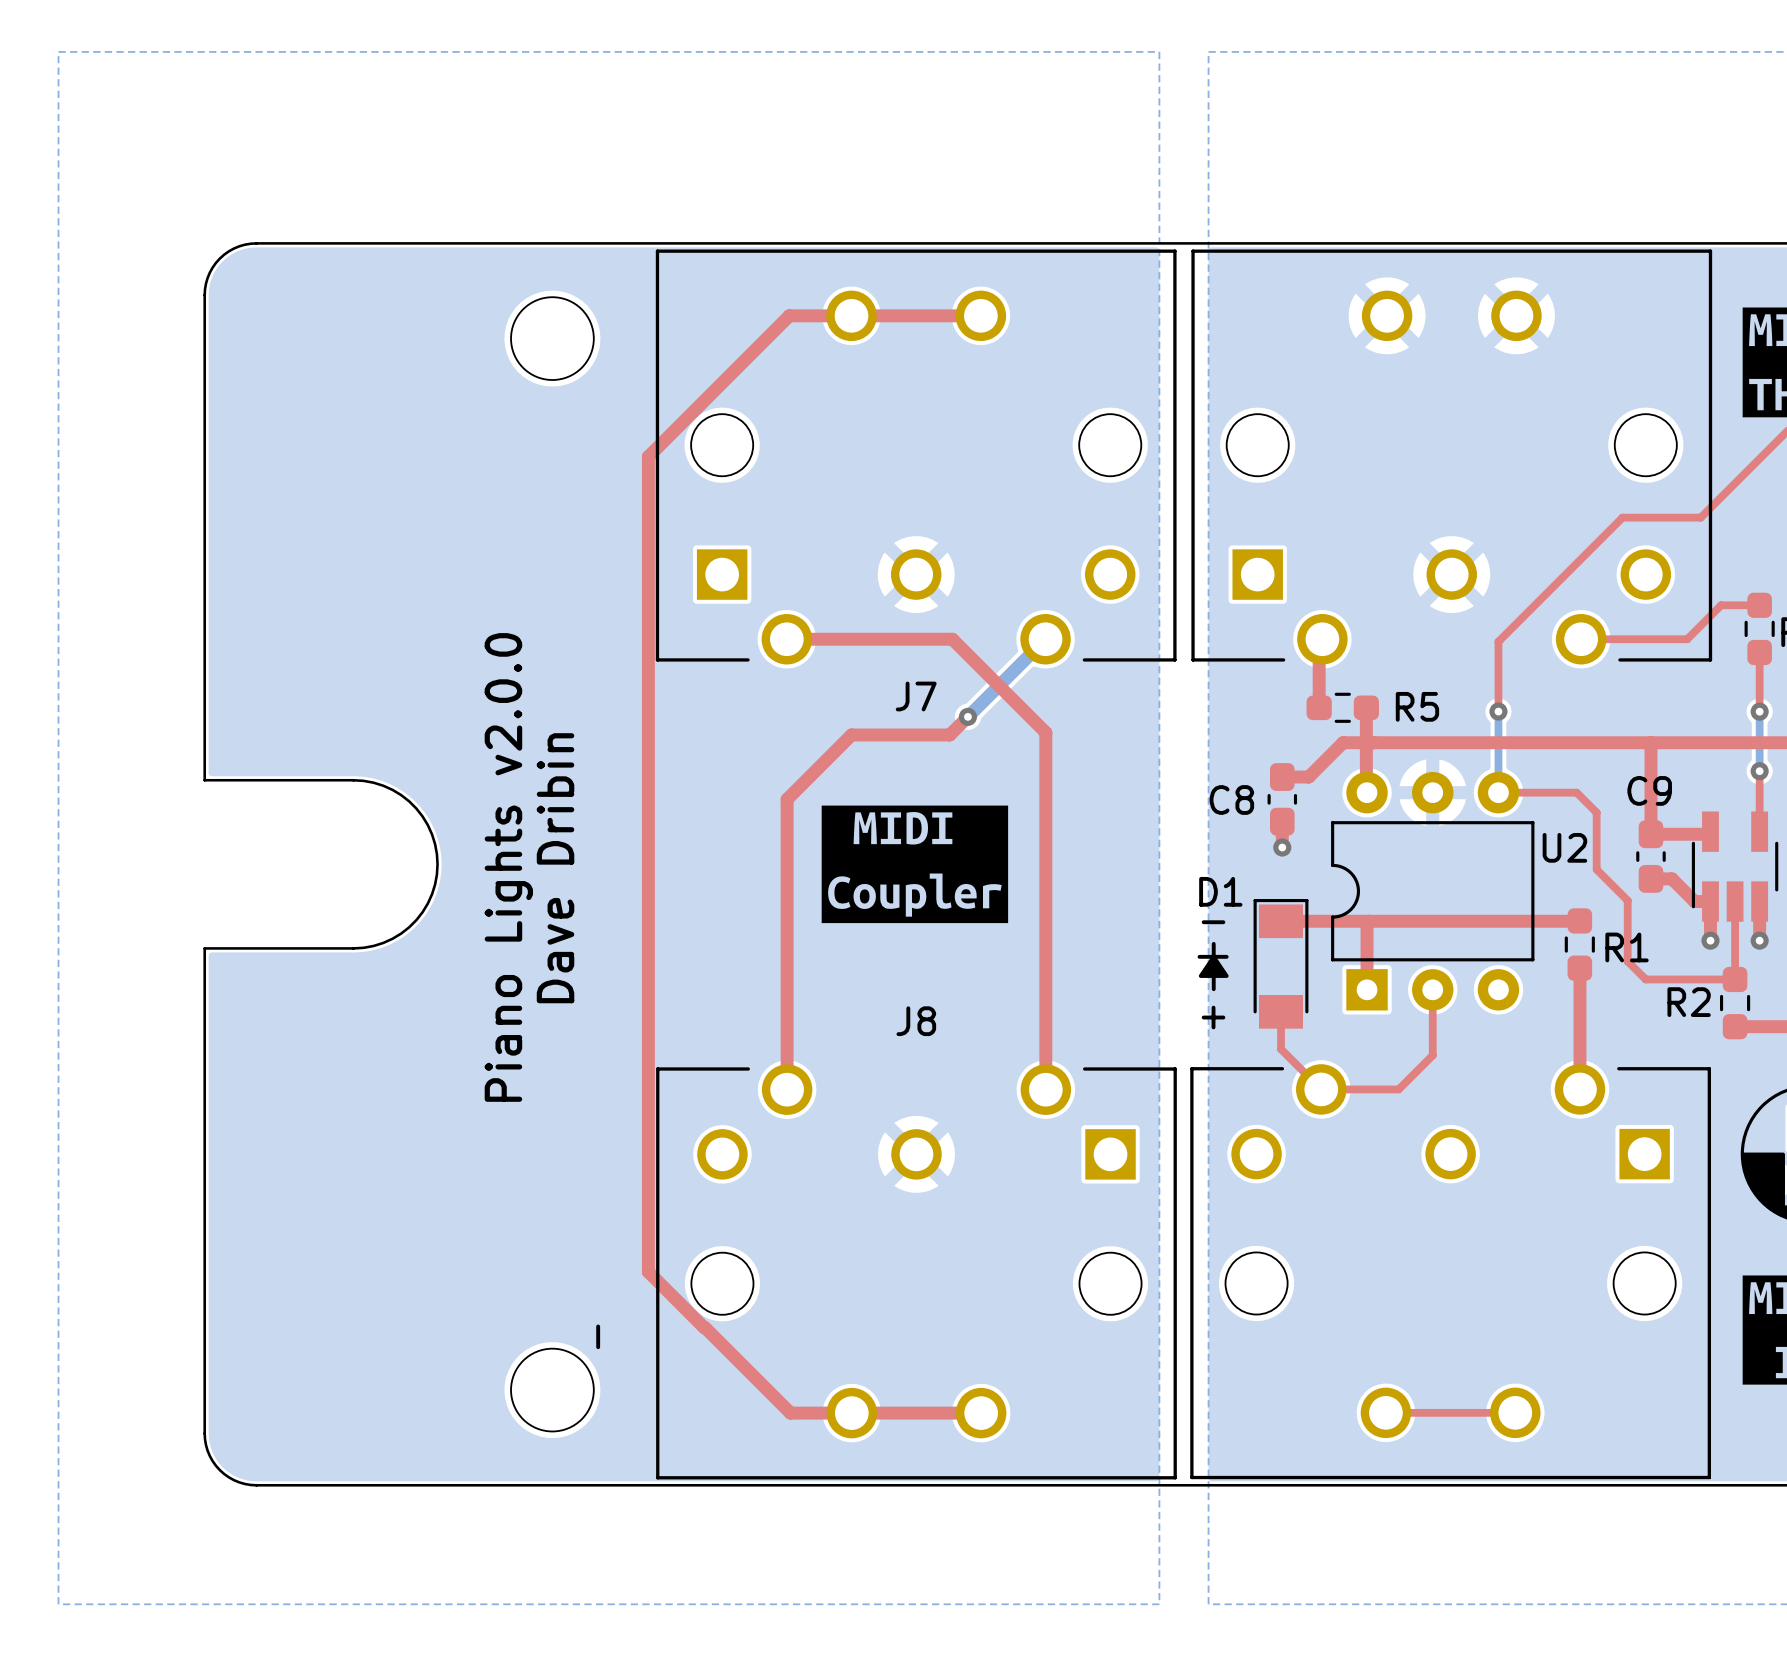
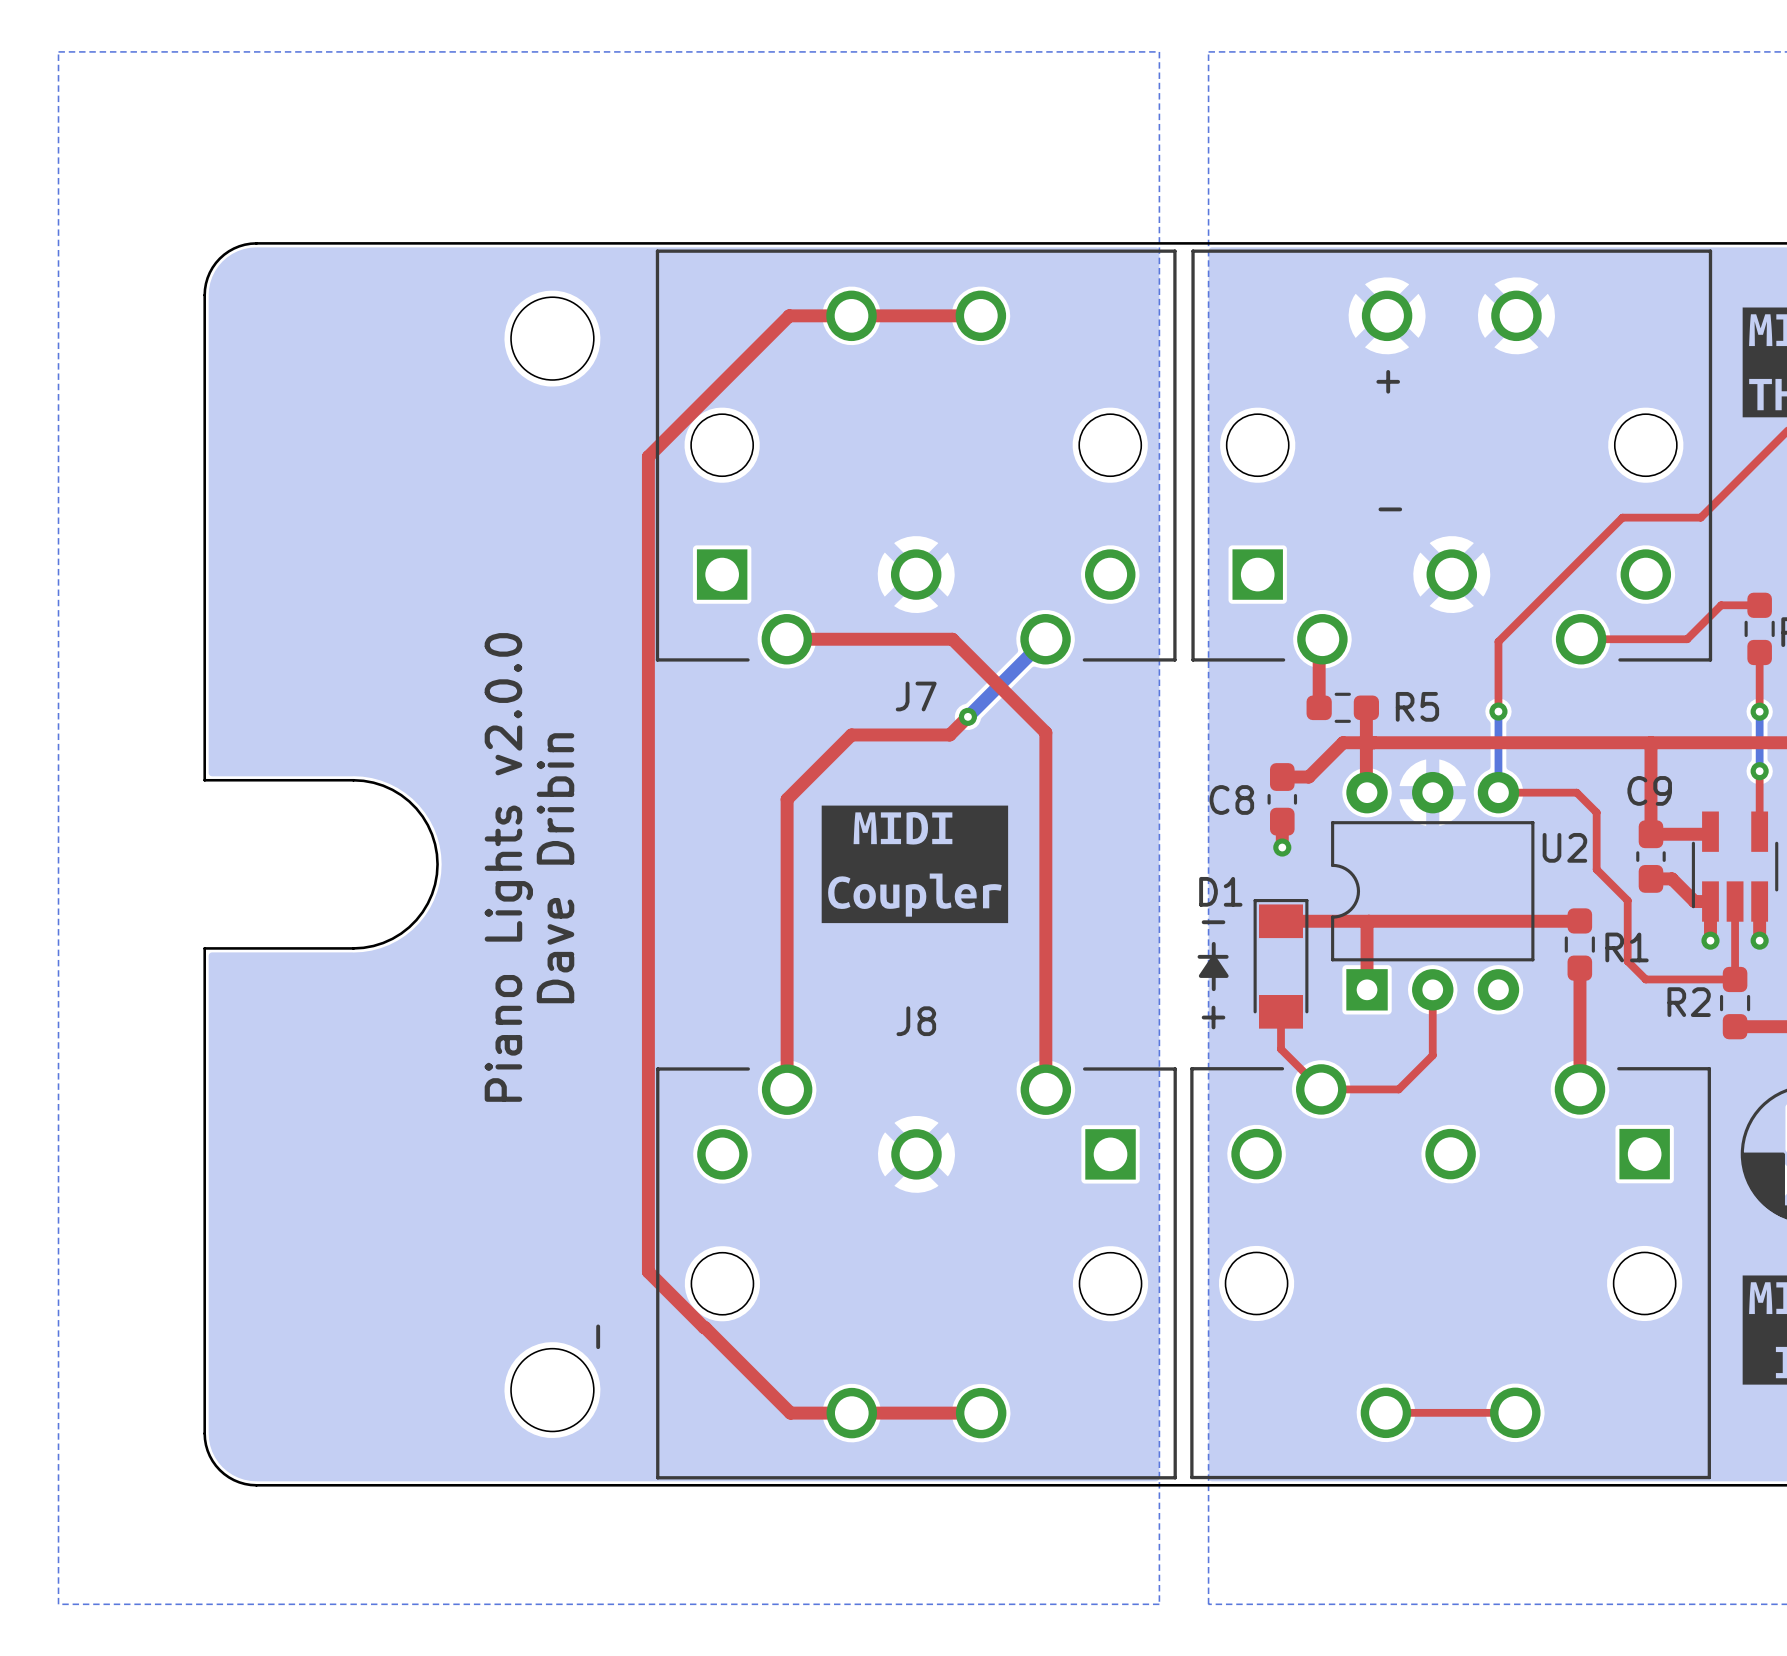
text: none -> + (1388, 381)
text: none -> - (1390, 509)

